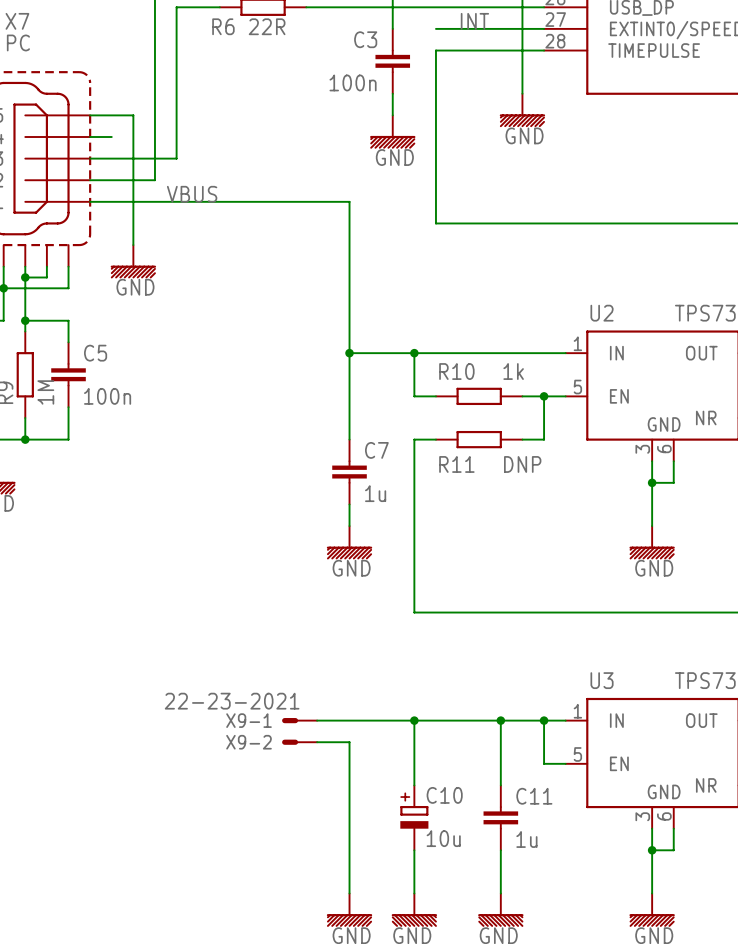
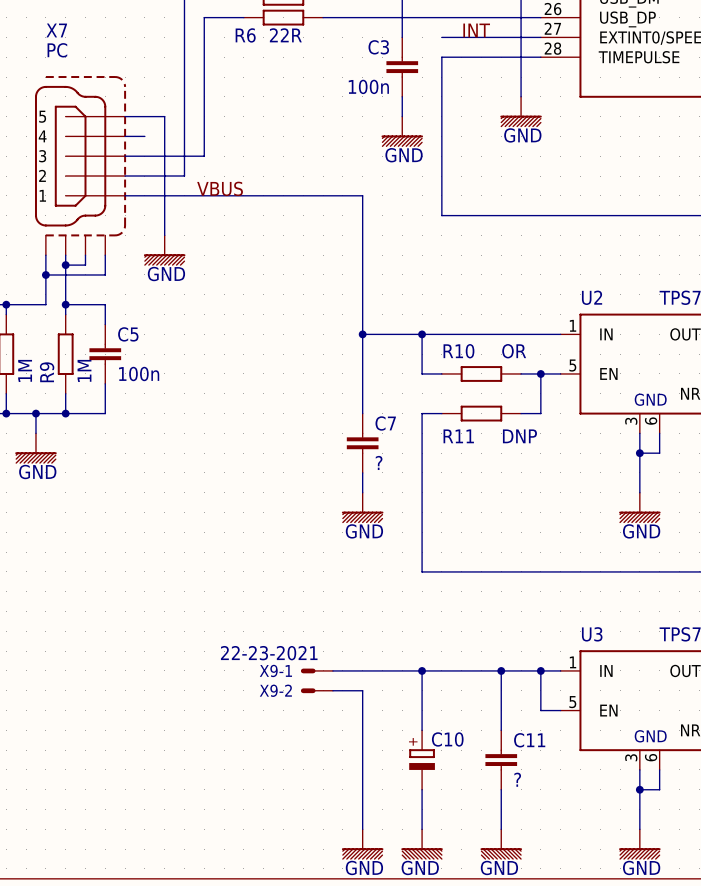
R10 value: 1k (513, 371) -> OR (514, 351)
C7 value: 1u (375, 493) -> ? (379, 462)
C10 value: 10u (443, 838) -> none
C11 value: 1u (526, 839) -> ? (517, 779)

